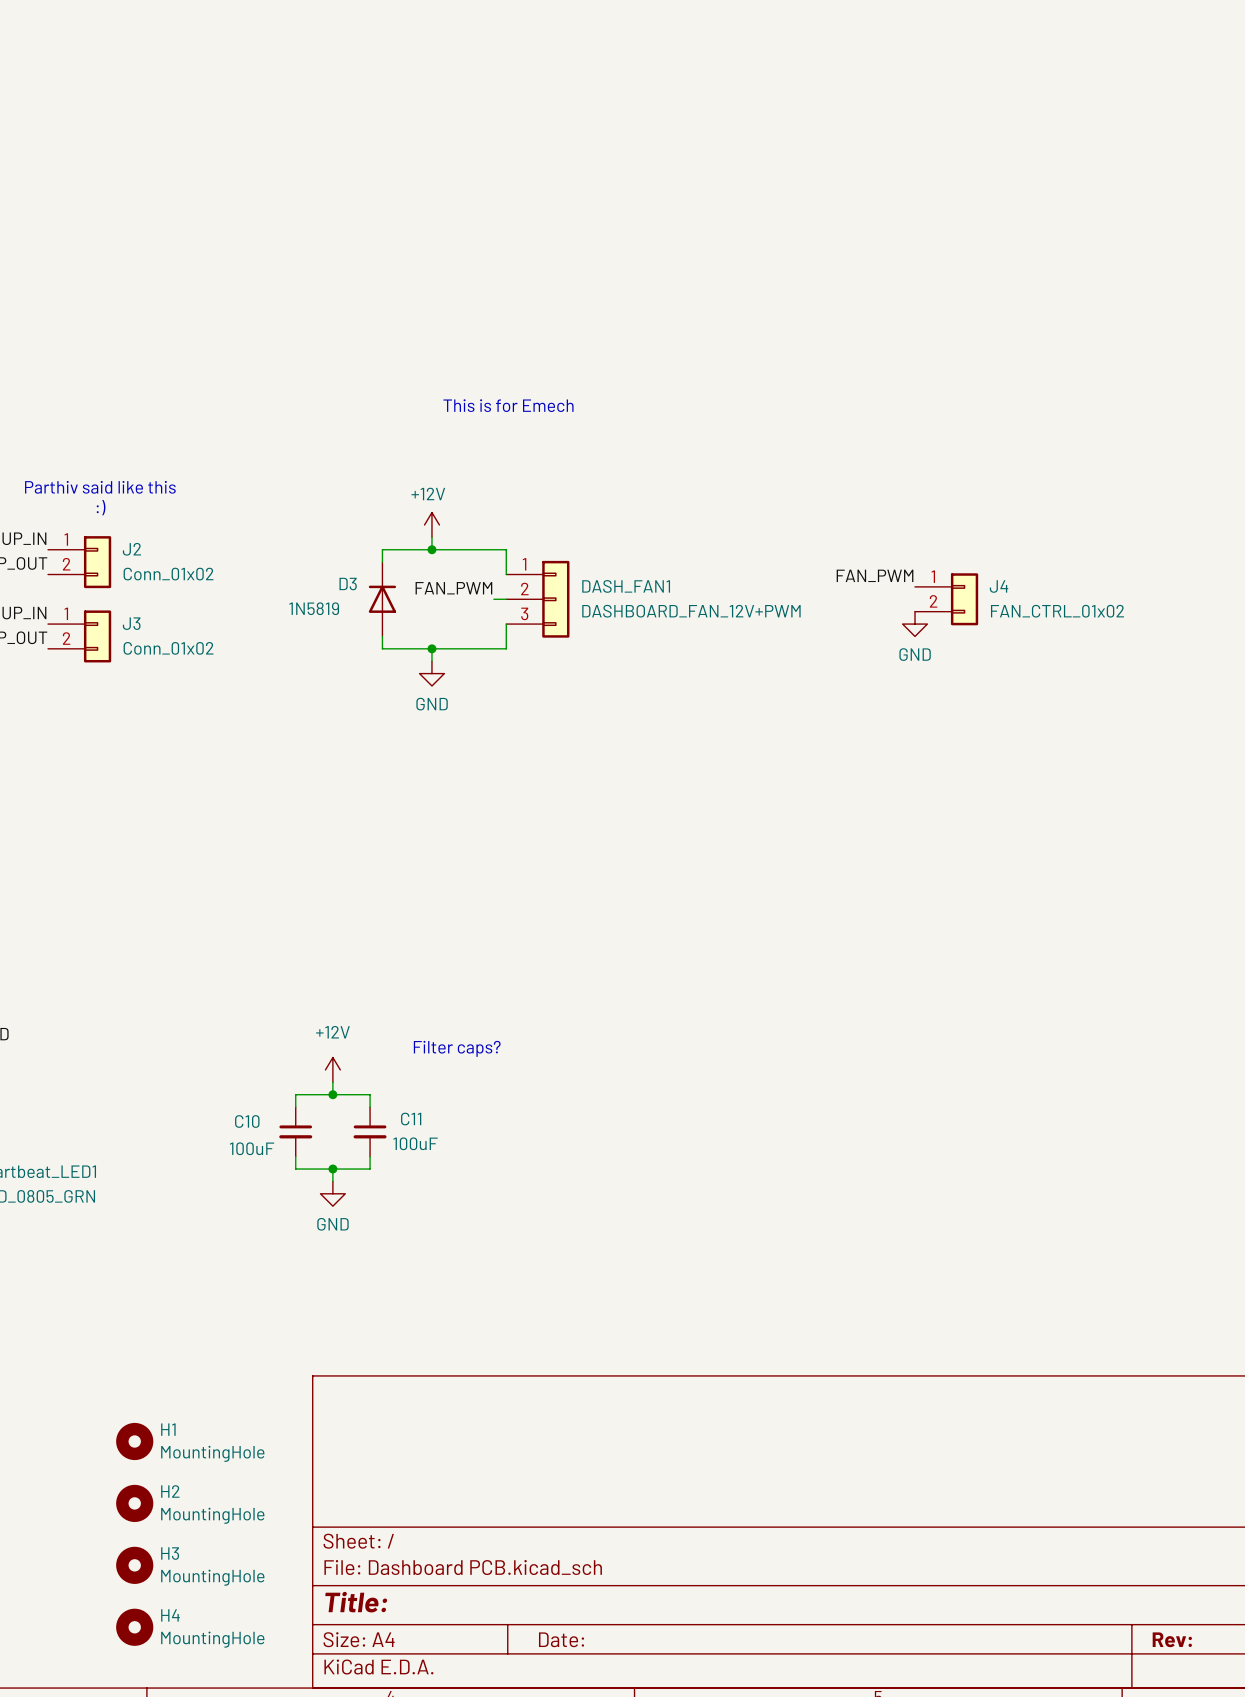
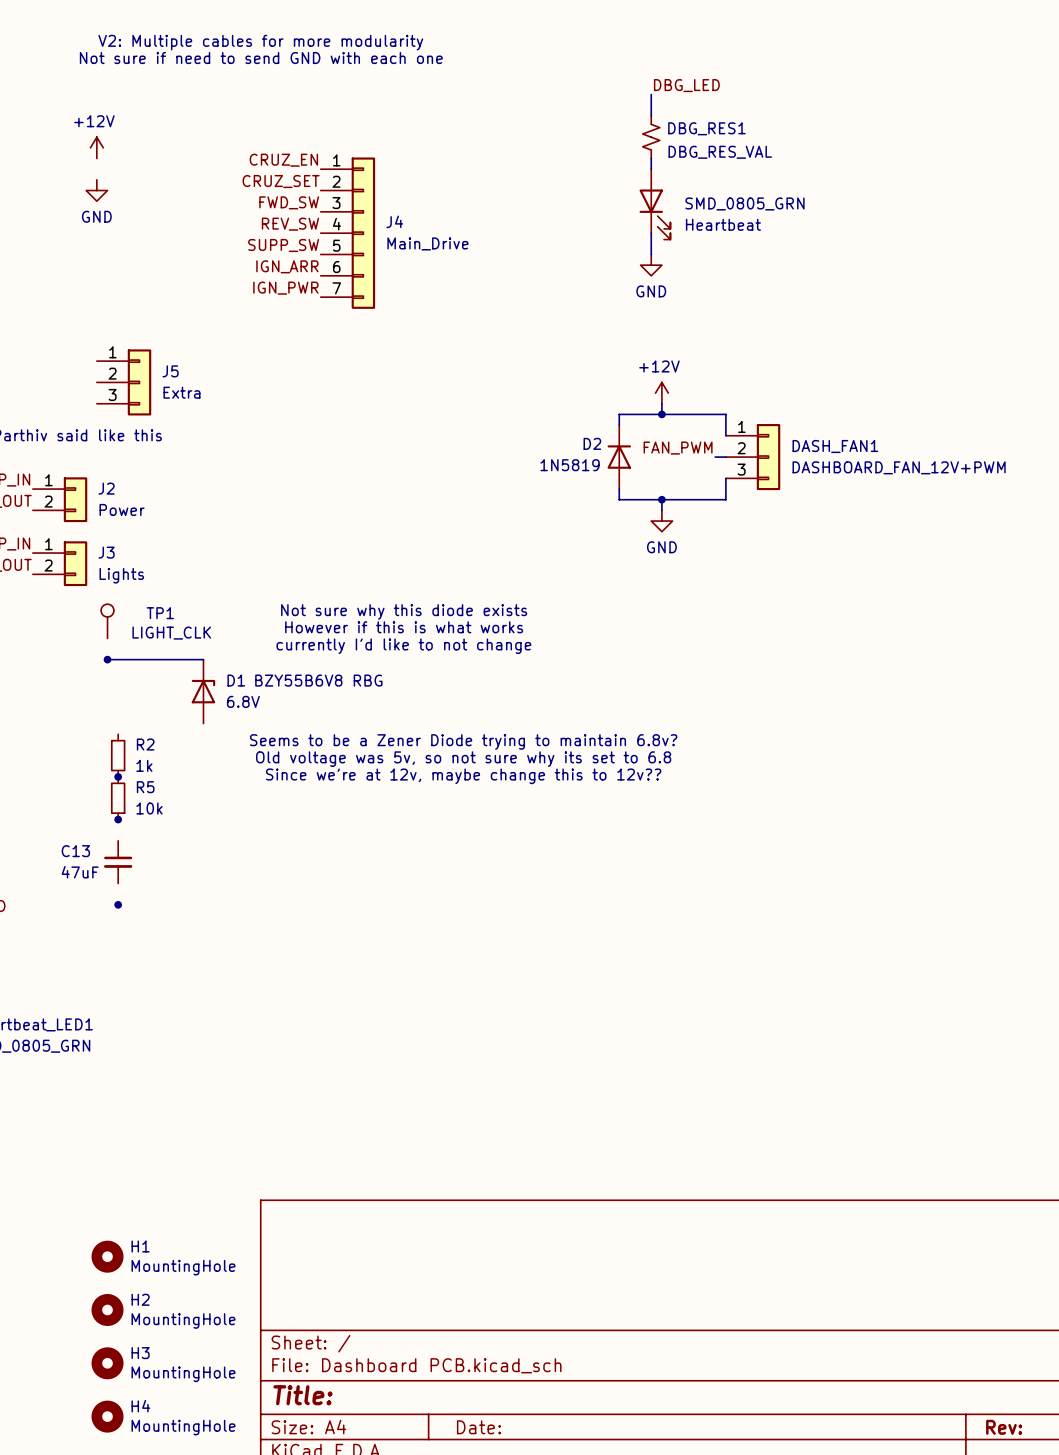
text: none -> V2: Multiple cables for more modularity (260, 42)
text: none -> Not sure if need to send GND with each one (261, 58)
label: none -> DBG_LED (686, 85)
wire: none -> (651, 94) (651, 115)
DBG_RES1: none -> DBG_RES_VAL (651, 137)
power symbol: none -> +12V (96, 147)
wire: none -> (651, 158) (651, 169)
label: none -> CRUZ_EN (283, 160)
label: none -> CRUZ_SET (281, 181)
power symbol: none -> GND (96, 190)
label: none -> FWD_SW (289, 202)
SMD_0805_GRN: none -> Heartbeat (654, 204)
label: none -> REV_SW (290, 224)
wire: none -> (651, 233) (651, 254)
label: none -> SUPP_SW (283, 245)
power symbol: none -> GND (651, 265)
label: none -> IGN_ARR (287, 266)
label: none -> IGN_PWR (285, 288)
text: This is for Emech (508, 405) -> none
J5: none -> Extra (124, 382)
power symbol: none -> +12V (661, 393)
wire: none -> (661, 403) (661, 414)
junction: none -> (661, 414)
wire: none -> (619, 425) (619, 414) (725, 414) (725, 435)
text: :) (101, 507) -> none
D2: none -> 1N5819 (619, 457)
wire: none -> (715, 457) (725, 457)
power symbol: +12V (431, 524) -> none
wire: (431, 537) (431, 549) -> none
wire: none -> (725, 478) (725, 499) (619, 499) (619, 489)
junction: (431, 549) -> none
wire: (382, 562) (382, 549) (506, 549) (506, 574) -> none
wire: none -> (661, 499) (661, 510)
junction: none -> (661, 499)
J4 symbol: [915, 573, 979, 626] -> [320, 157, 376, 309]
J2 value: Conn_01x02 (168, 574) -> Power (122, 509)
label position: FAN_PWM (875, 575) -> FAN_PWM (678, 448)
label: FAN_PWM (453, 588) -> none
D3: 1N5819 (382, 599) -> none
wire: (493, 599) (506, 599) -> none
DASH_FAN1 position: (537, 599) -> (753, 457)
J4 value: FAN_CTRL_01x02 (1057, 611) -> Main_Drive (427, 243)
wire: (506, 624) (506, 648) (382, 648) (382, 636) -> none
power symbol position: GND (915, 624) -> GND (661, 521)
J3 value: Conn_01x02 (168, 648) -> Lights (121, 575)
wire: (431, 648) (431, 661) -> none
junction: (431, 648) -> none
power symbol: GND (431, 673) -> none
text: none -> Not sure why this diode exists (404, 611)
TP1: none -> LIGHT_CLK (107, 621)
text: none -> However if this is what works (404, 627)
text: none -> currently I'd like to not change (403, 646)
wire: none -> (107, 659) (203, 659)
junction: none -> (107, 659)
text: none -> BZY55B6V8 RBG (318, 680)
D1: none -> 6.8V (203, 691)
text: none -> Seems to be a Zener Diode trying to maintain 6.8v? (463, 741)
R2: none -> 1k (118, 755)
text: none -> Old voltage was 5v, so not sure why its set to 6.8 (463, 759)
text: none -> Since we're at 12v, maybe change this to 12v?? (463, 776)
junction: none -> (118, 776)
R5: none -> 10k (118, 798)
junction: none -> (118, 819)
C13: none -> 47uF (118, 862)
junction: none -> (118, 904)
text: Filter caps? (457, 1048) -> none
power symbol: +12V (332, 1069) -> none
wire: (332, 1082) (332, 1094) -> none
junction: (332, 1094) -> none
wire: (295, 1107) (295, 1094) (370, 1094) (370, 1107) -> none
C10: 100uF (295, 1131) -> none
C11: 100uF (370, 1131) -> none
wire: (295, 1156) (295, 1169) (370, 1169) (370, 1156) -> none
wire: (332, 1169) (332, 1181) -> none
junction: (332, 1169) -> none
power symbol: GND (332, 1193) -> none

